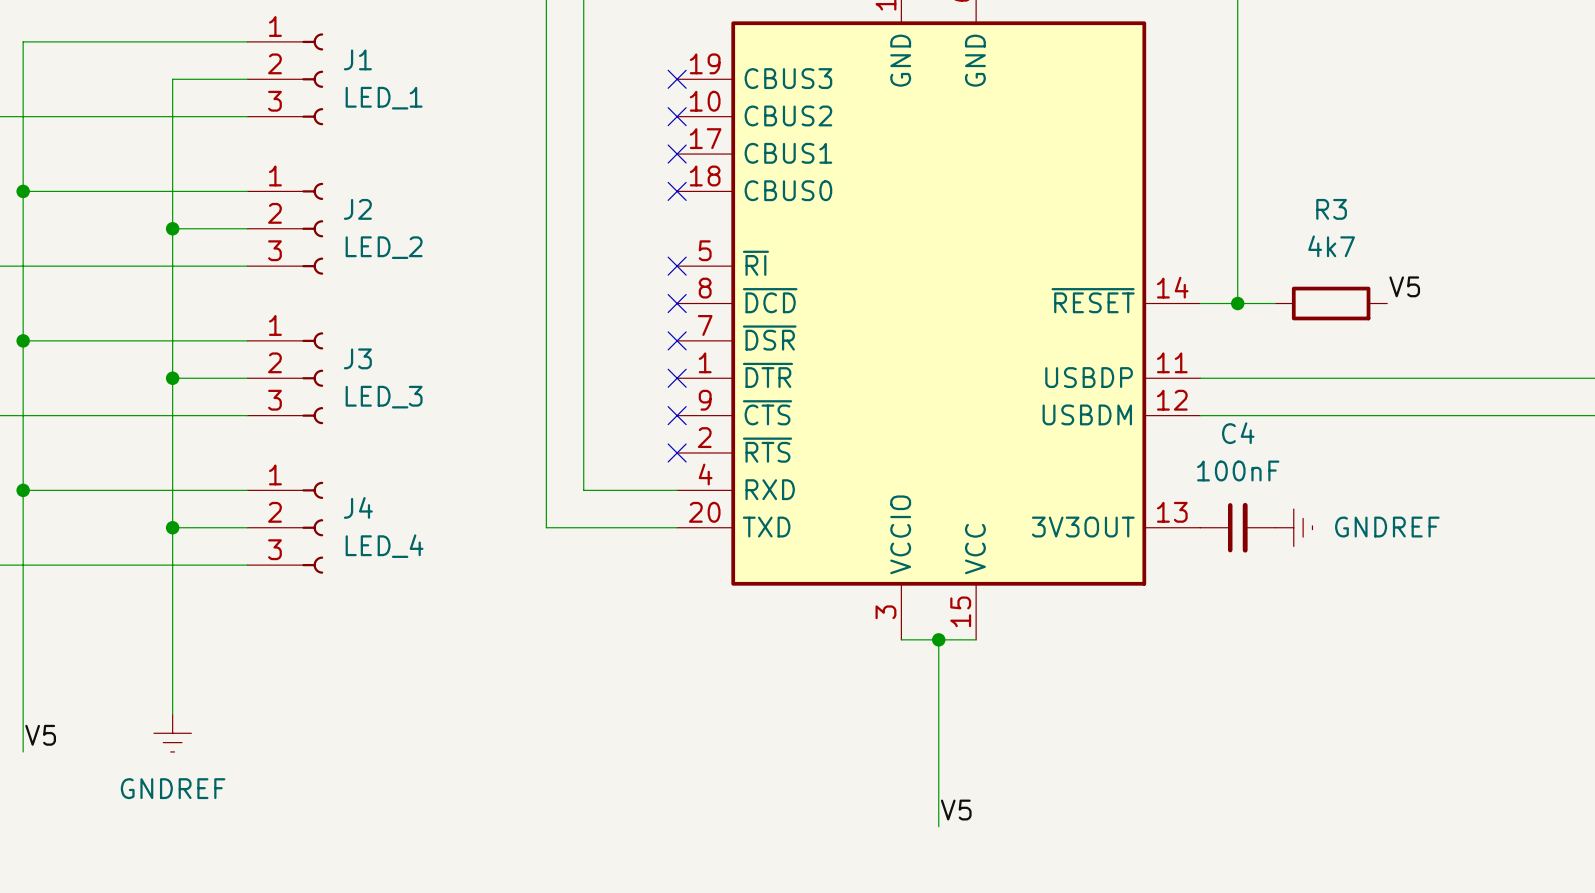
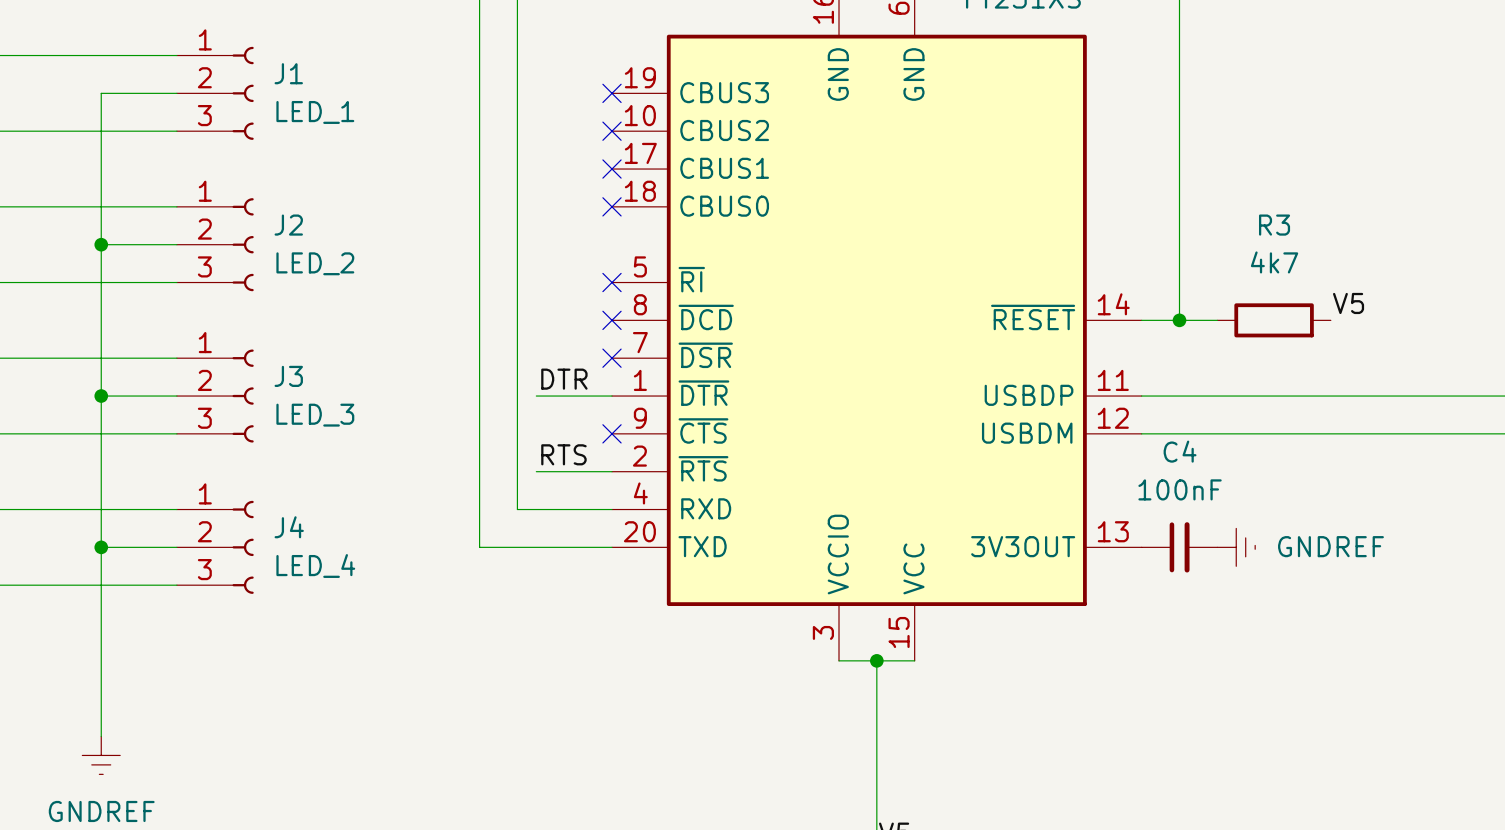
label: none -> DTR (564, 379)
wire: none -> (536, 396) (612, 396)
no-connect mark: (677, 378) -> none
label: none -> RTS (563, 454)
wire: none -> (536, 471) (612, 471)
no-connect mark: (677, 453) -> none

